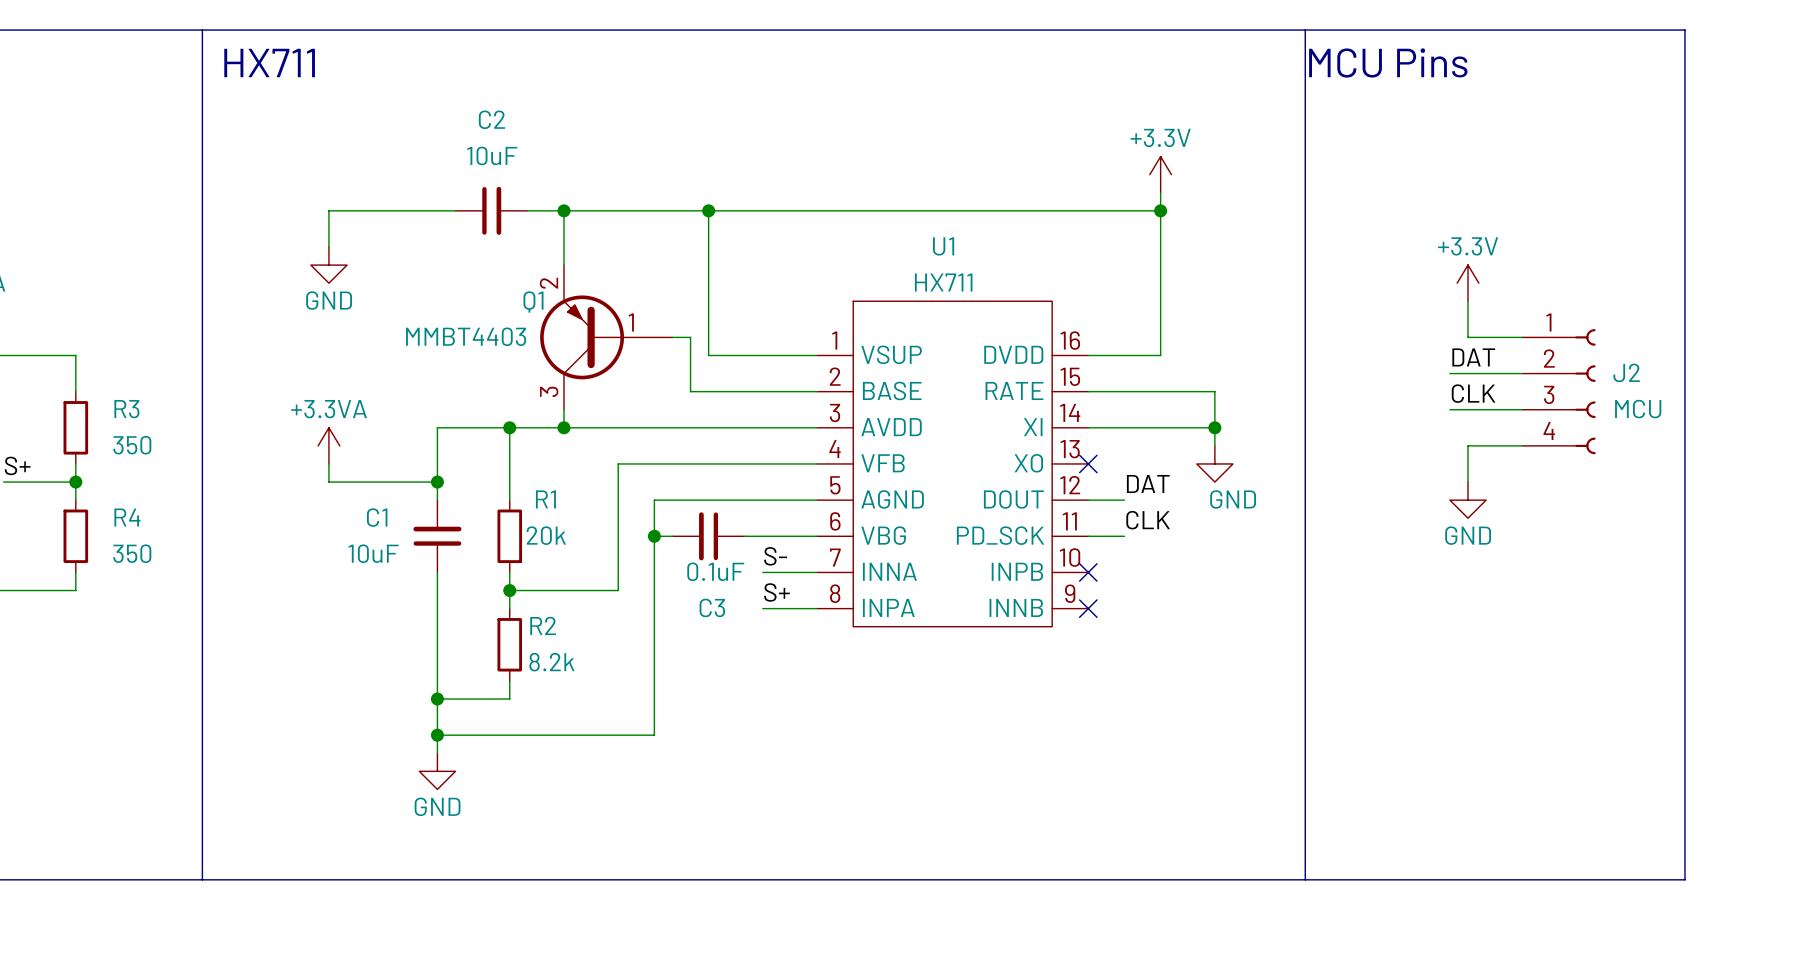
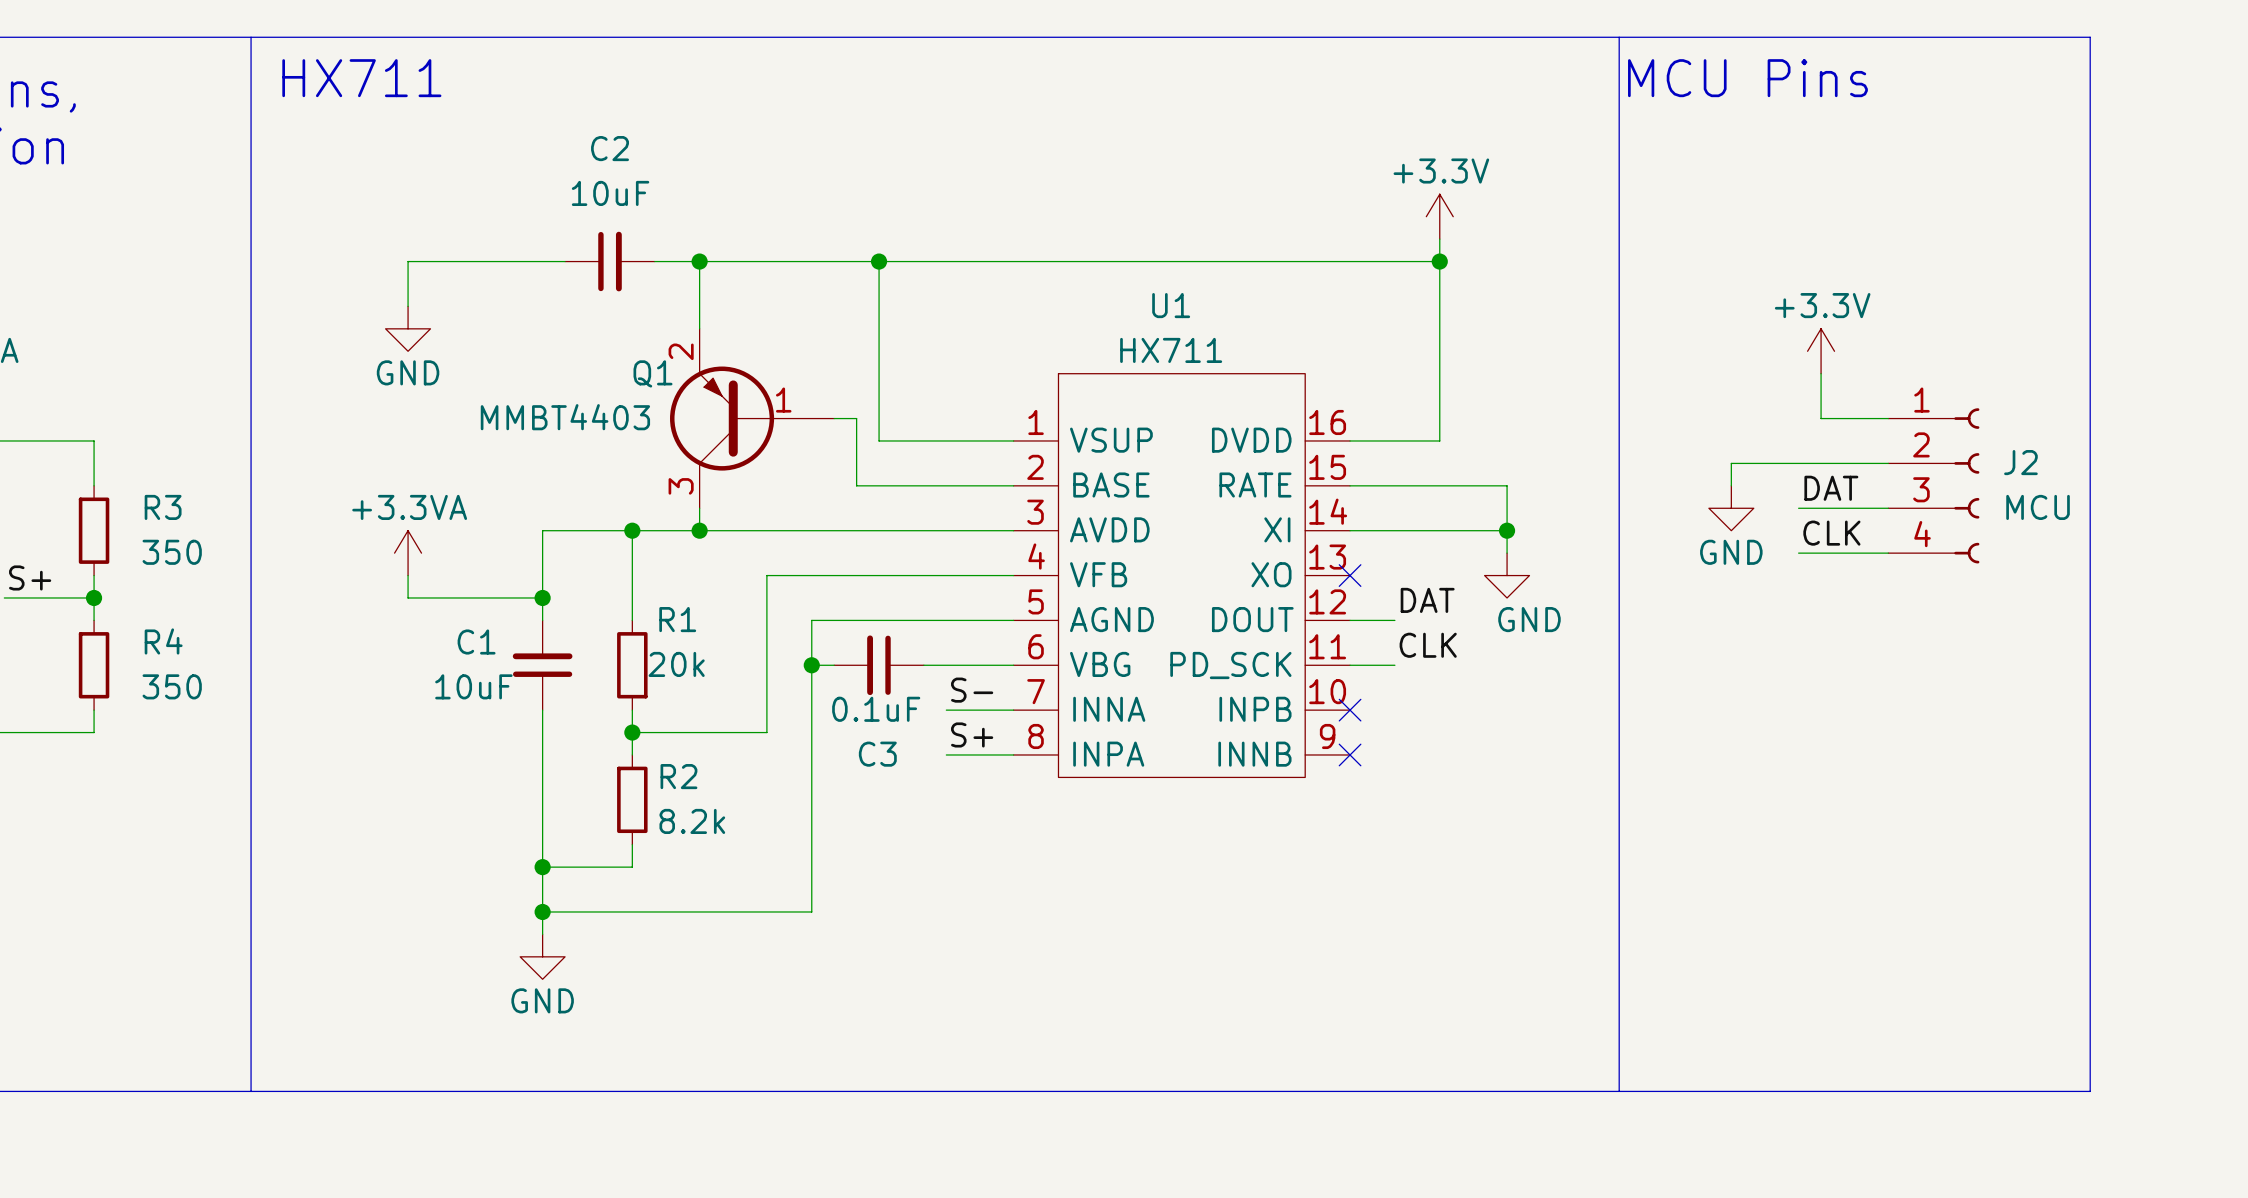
label: DAT (1473, 357) -> none
wire: none -> (1798, 463) (1731, 463) (1731, 485)
label: CLK (1473, 393) -> DAT (1831, 488)
label: none -> CLK (1831, 533)
wire: (1468, 445) (1468, 482) -> (1821, 553) (1798, 553)
power symbol position: GND (1468, 500) -> GND (1731, 508)

